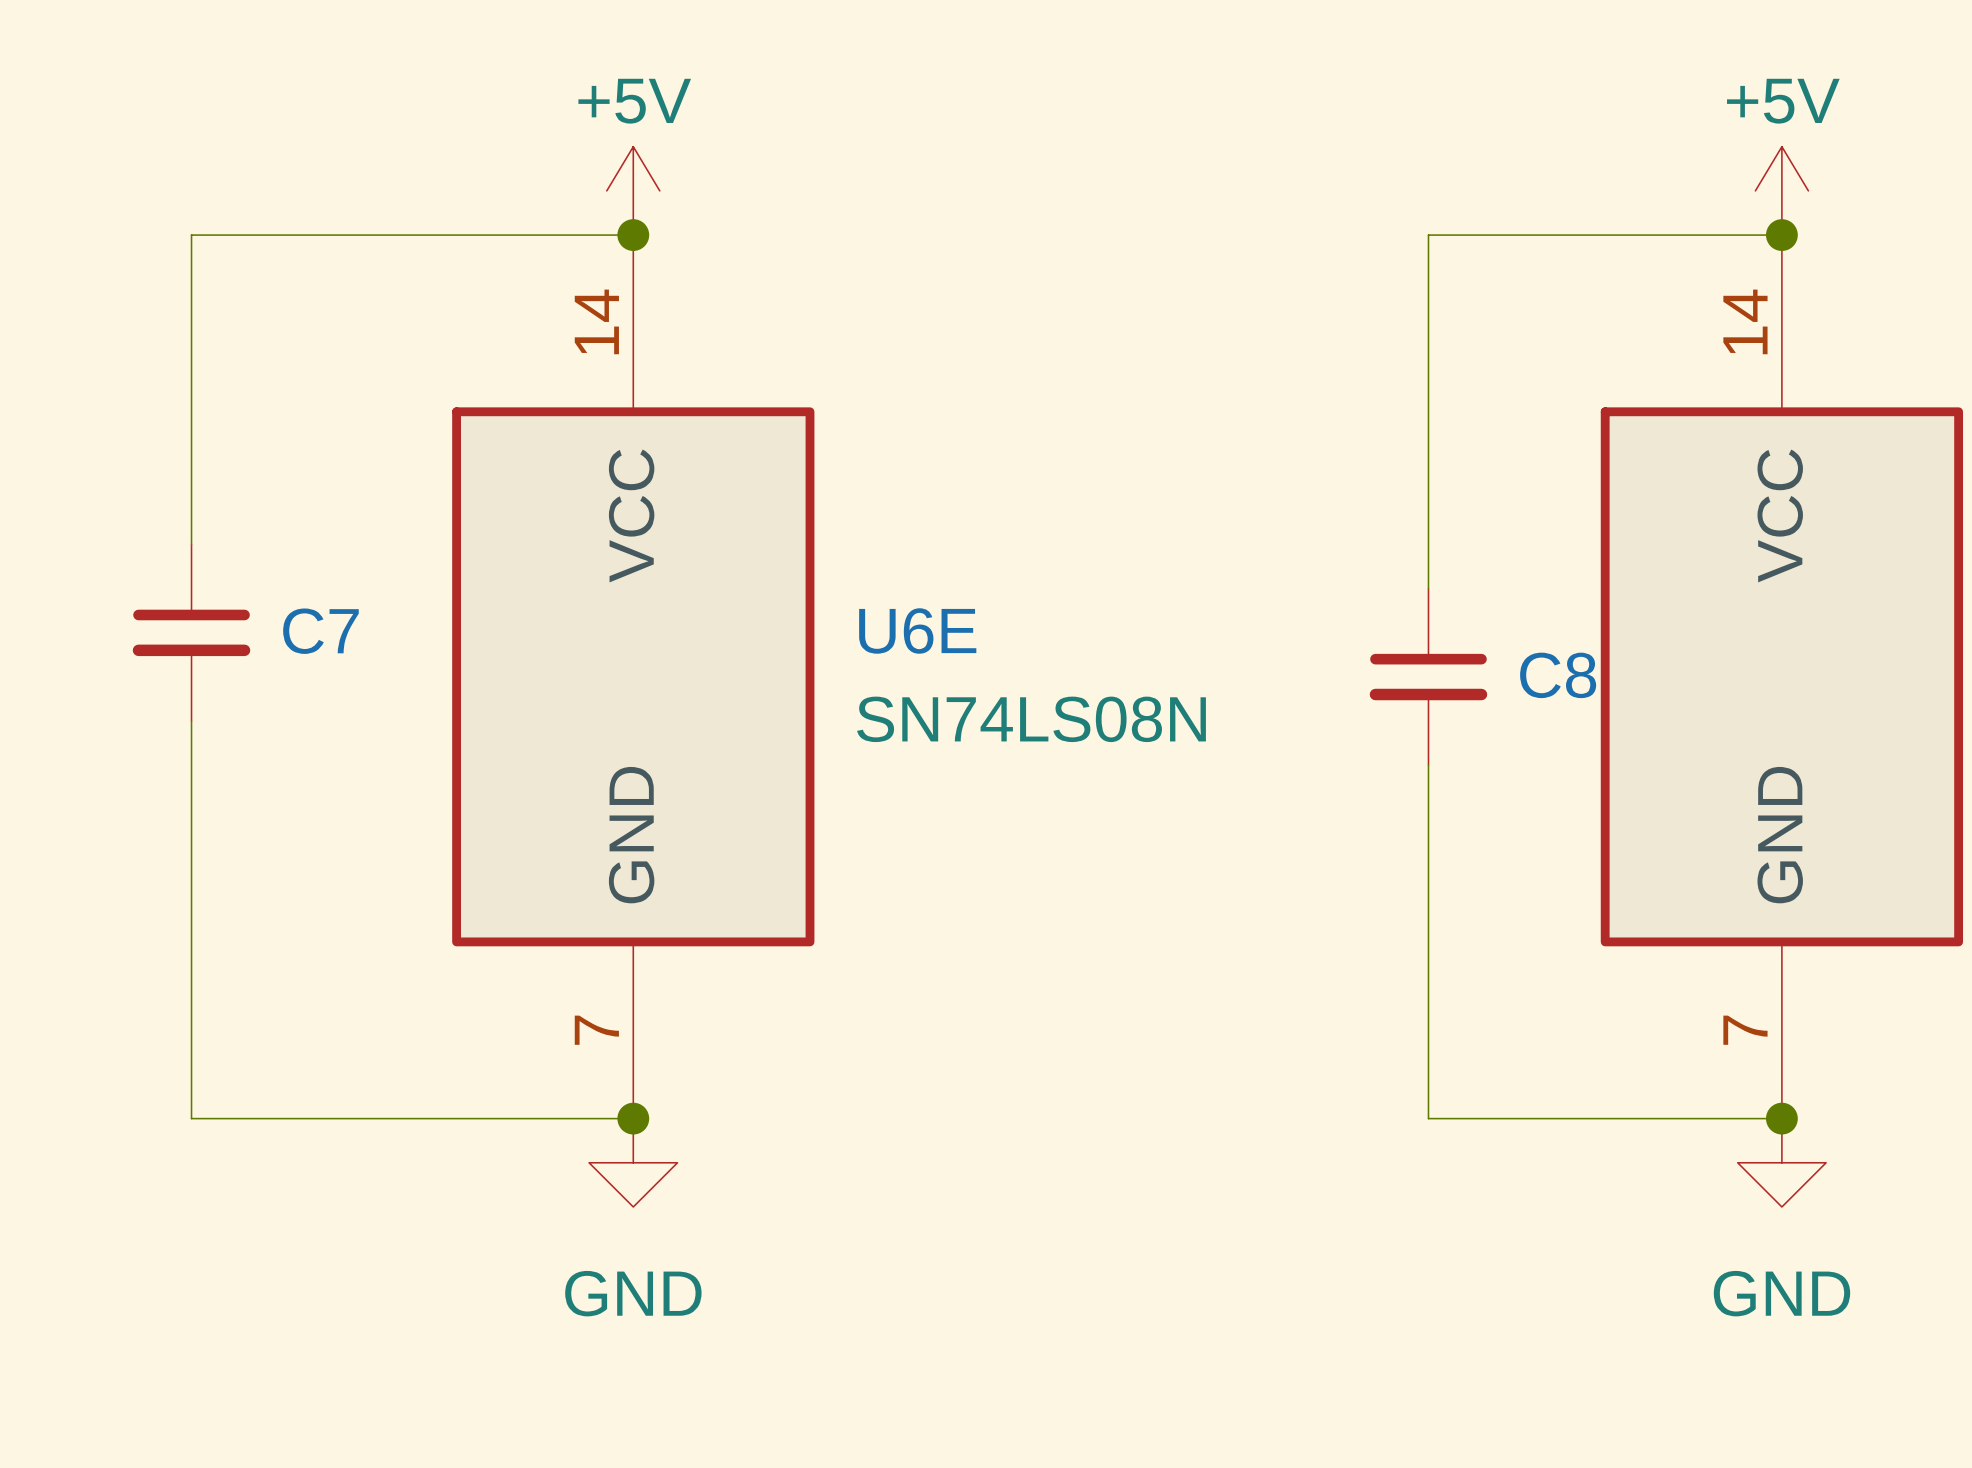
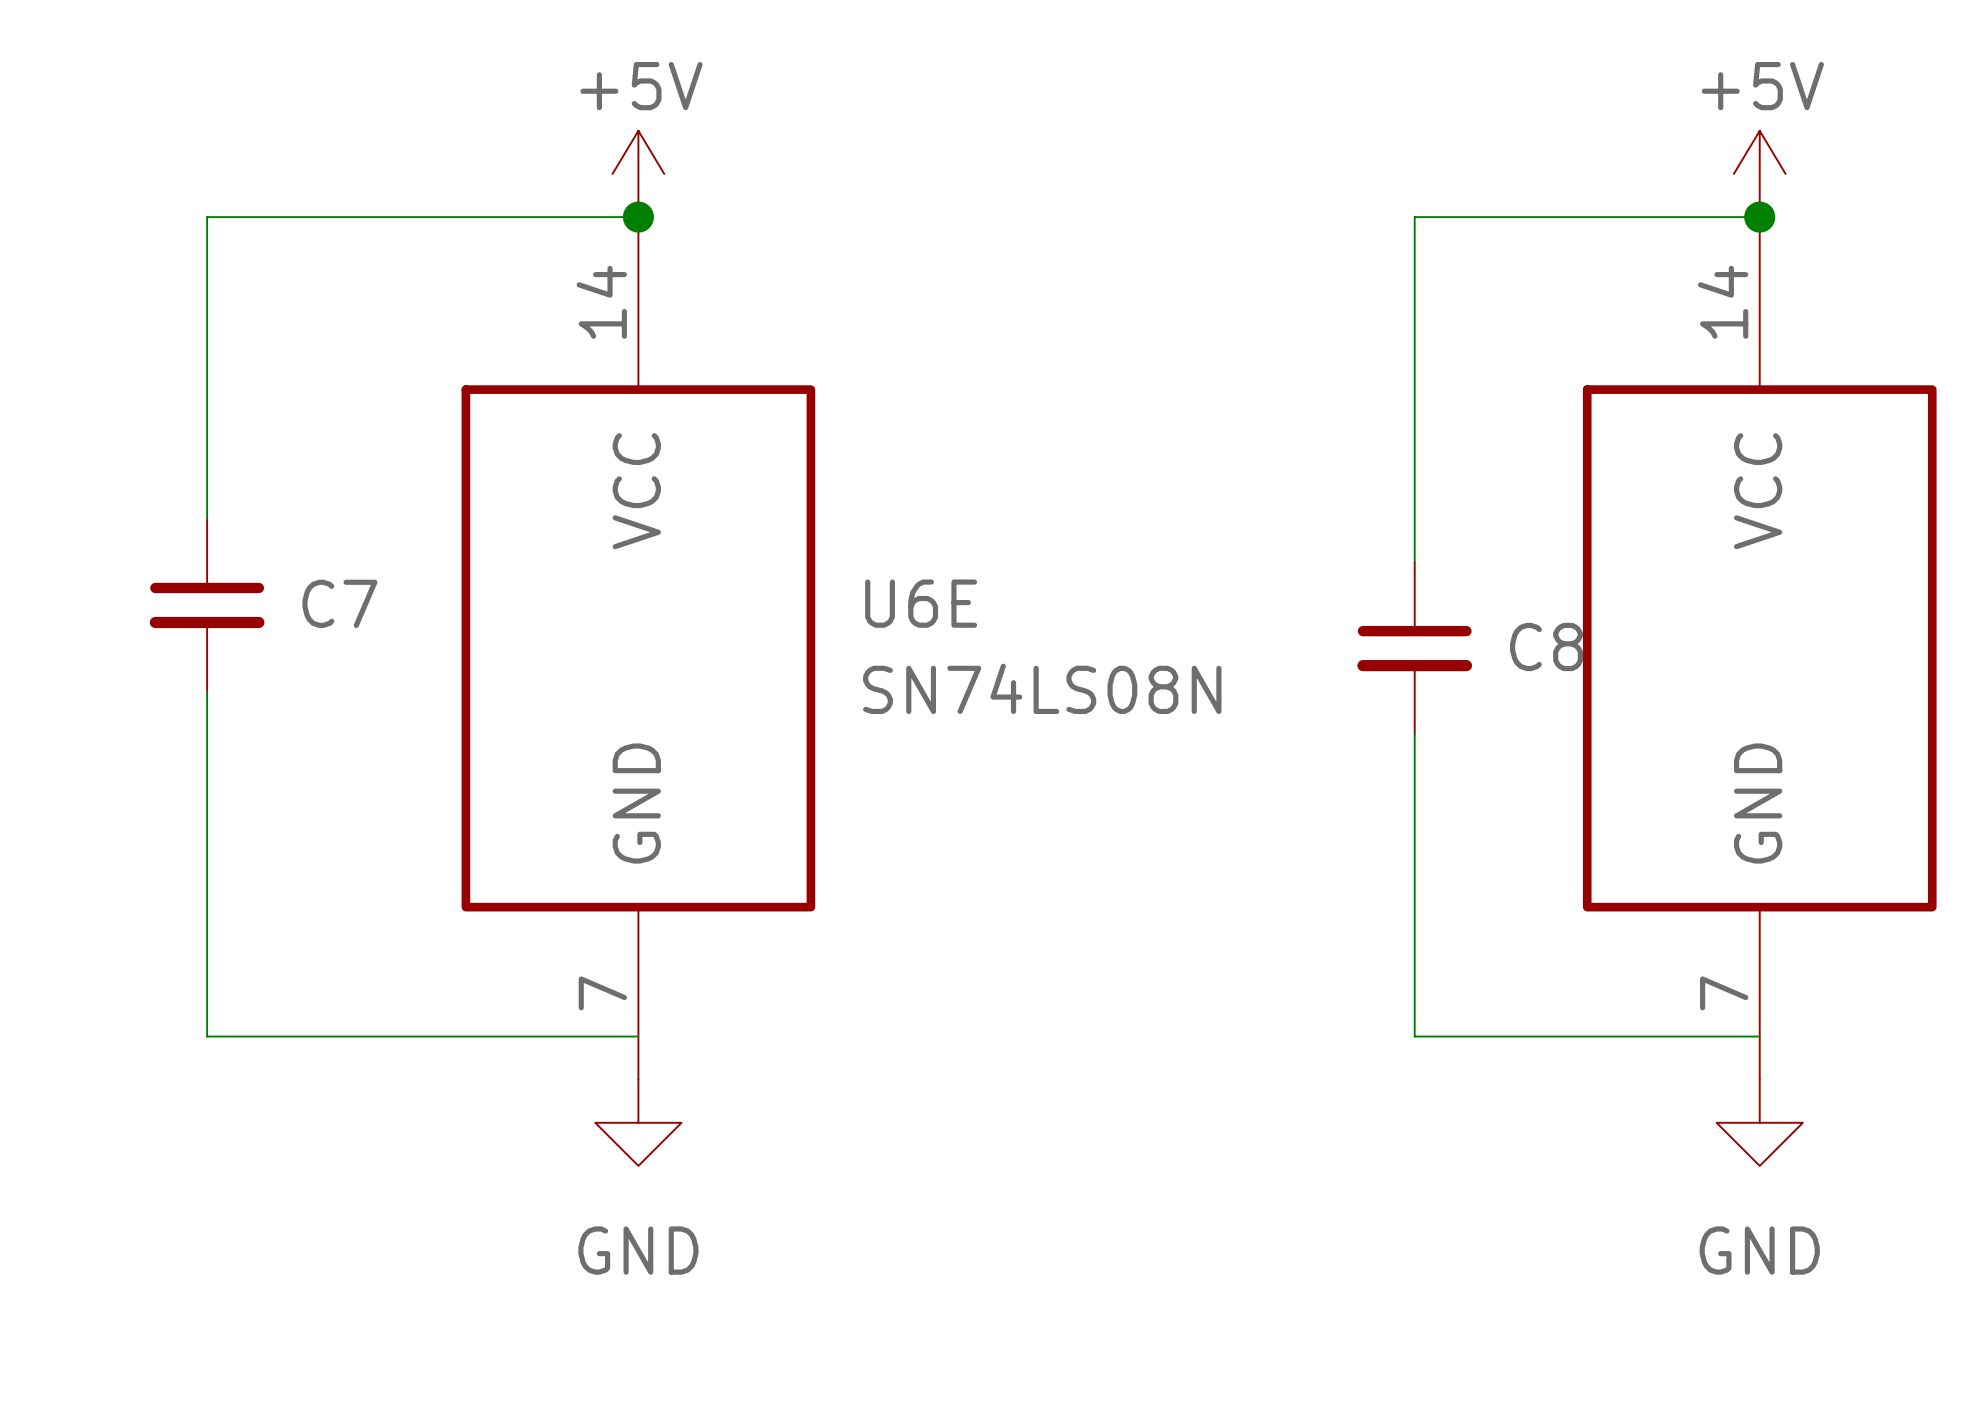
wire: (191, 1074) (191, 1118) (633, 1118) -> (207, 1036) (638, 1036)
wire: (1428, 1074) (1428, 1118) (1781, 1118) -> (1414, 1036) (1759, 1036)
junction: (633, 1118) -> none
junction: (1781, 1118) -> none

